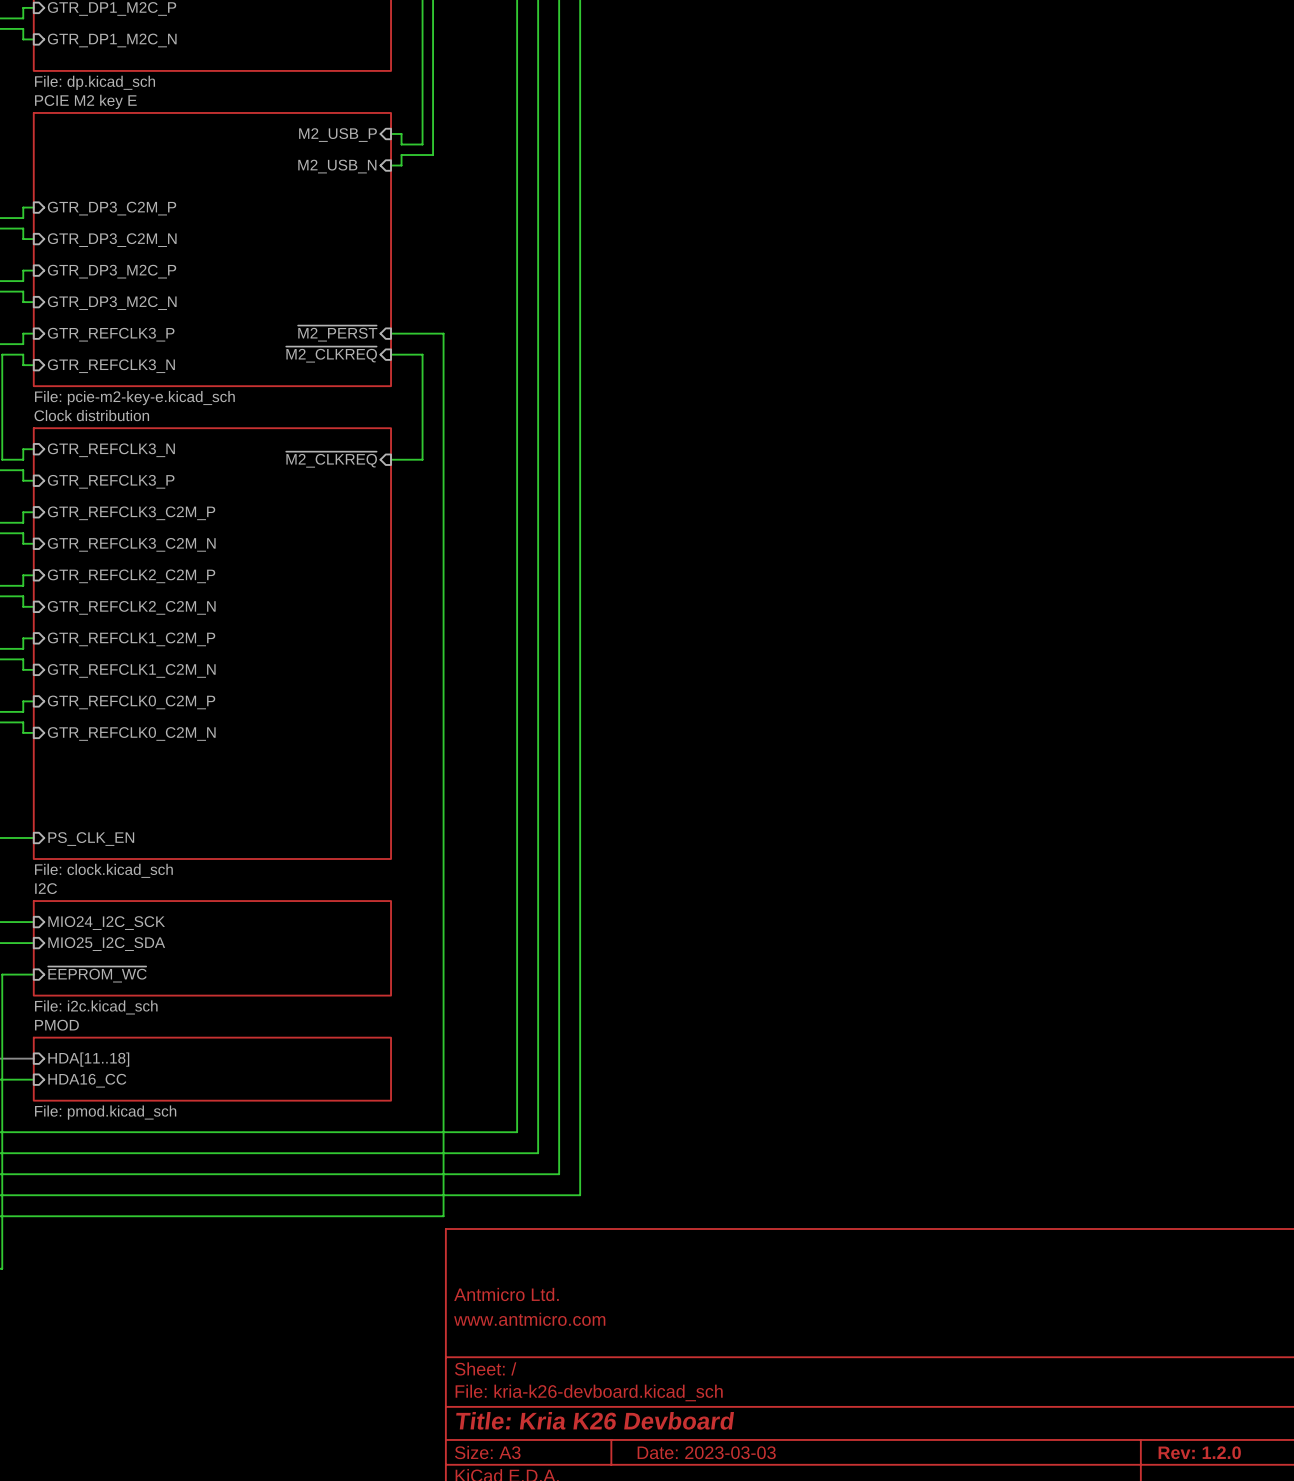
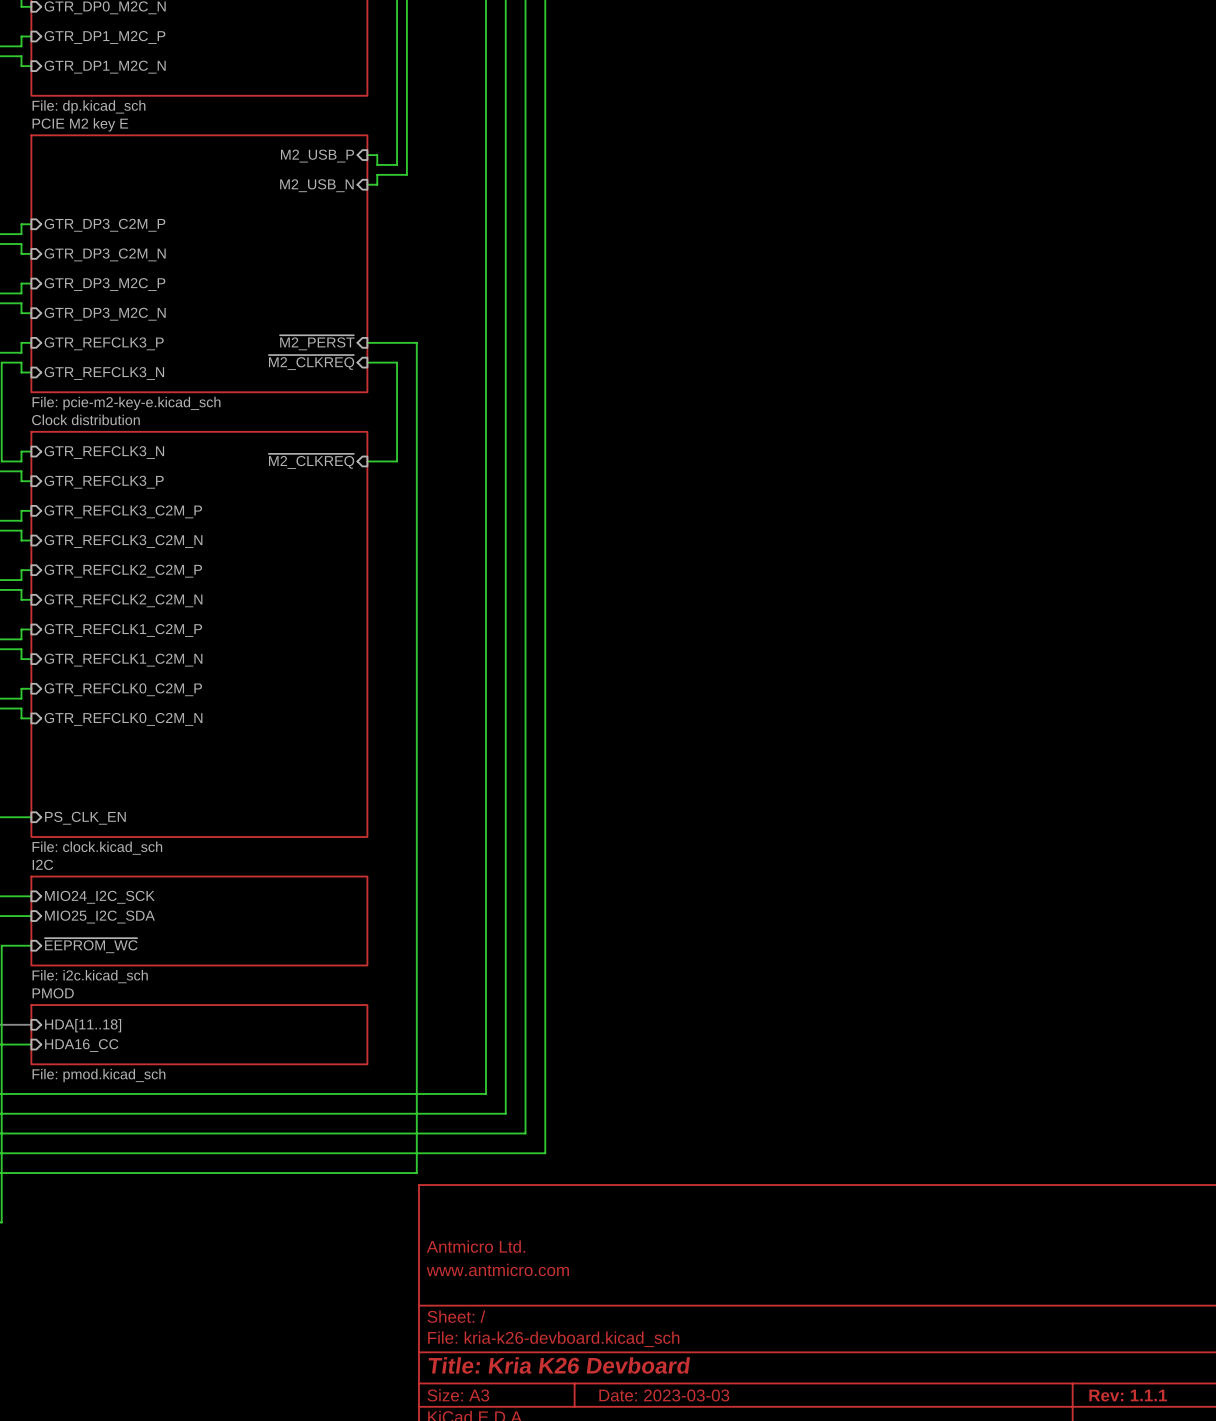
title block: Rev: 1.2.0 (1199, 1452) -> Rev: 1.1.1 (1128, 1395)

